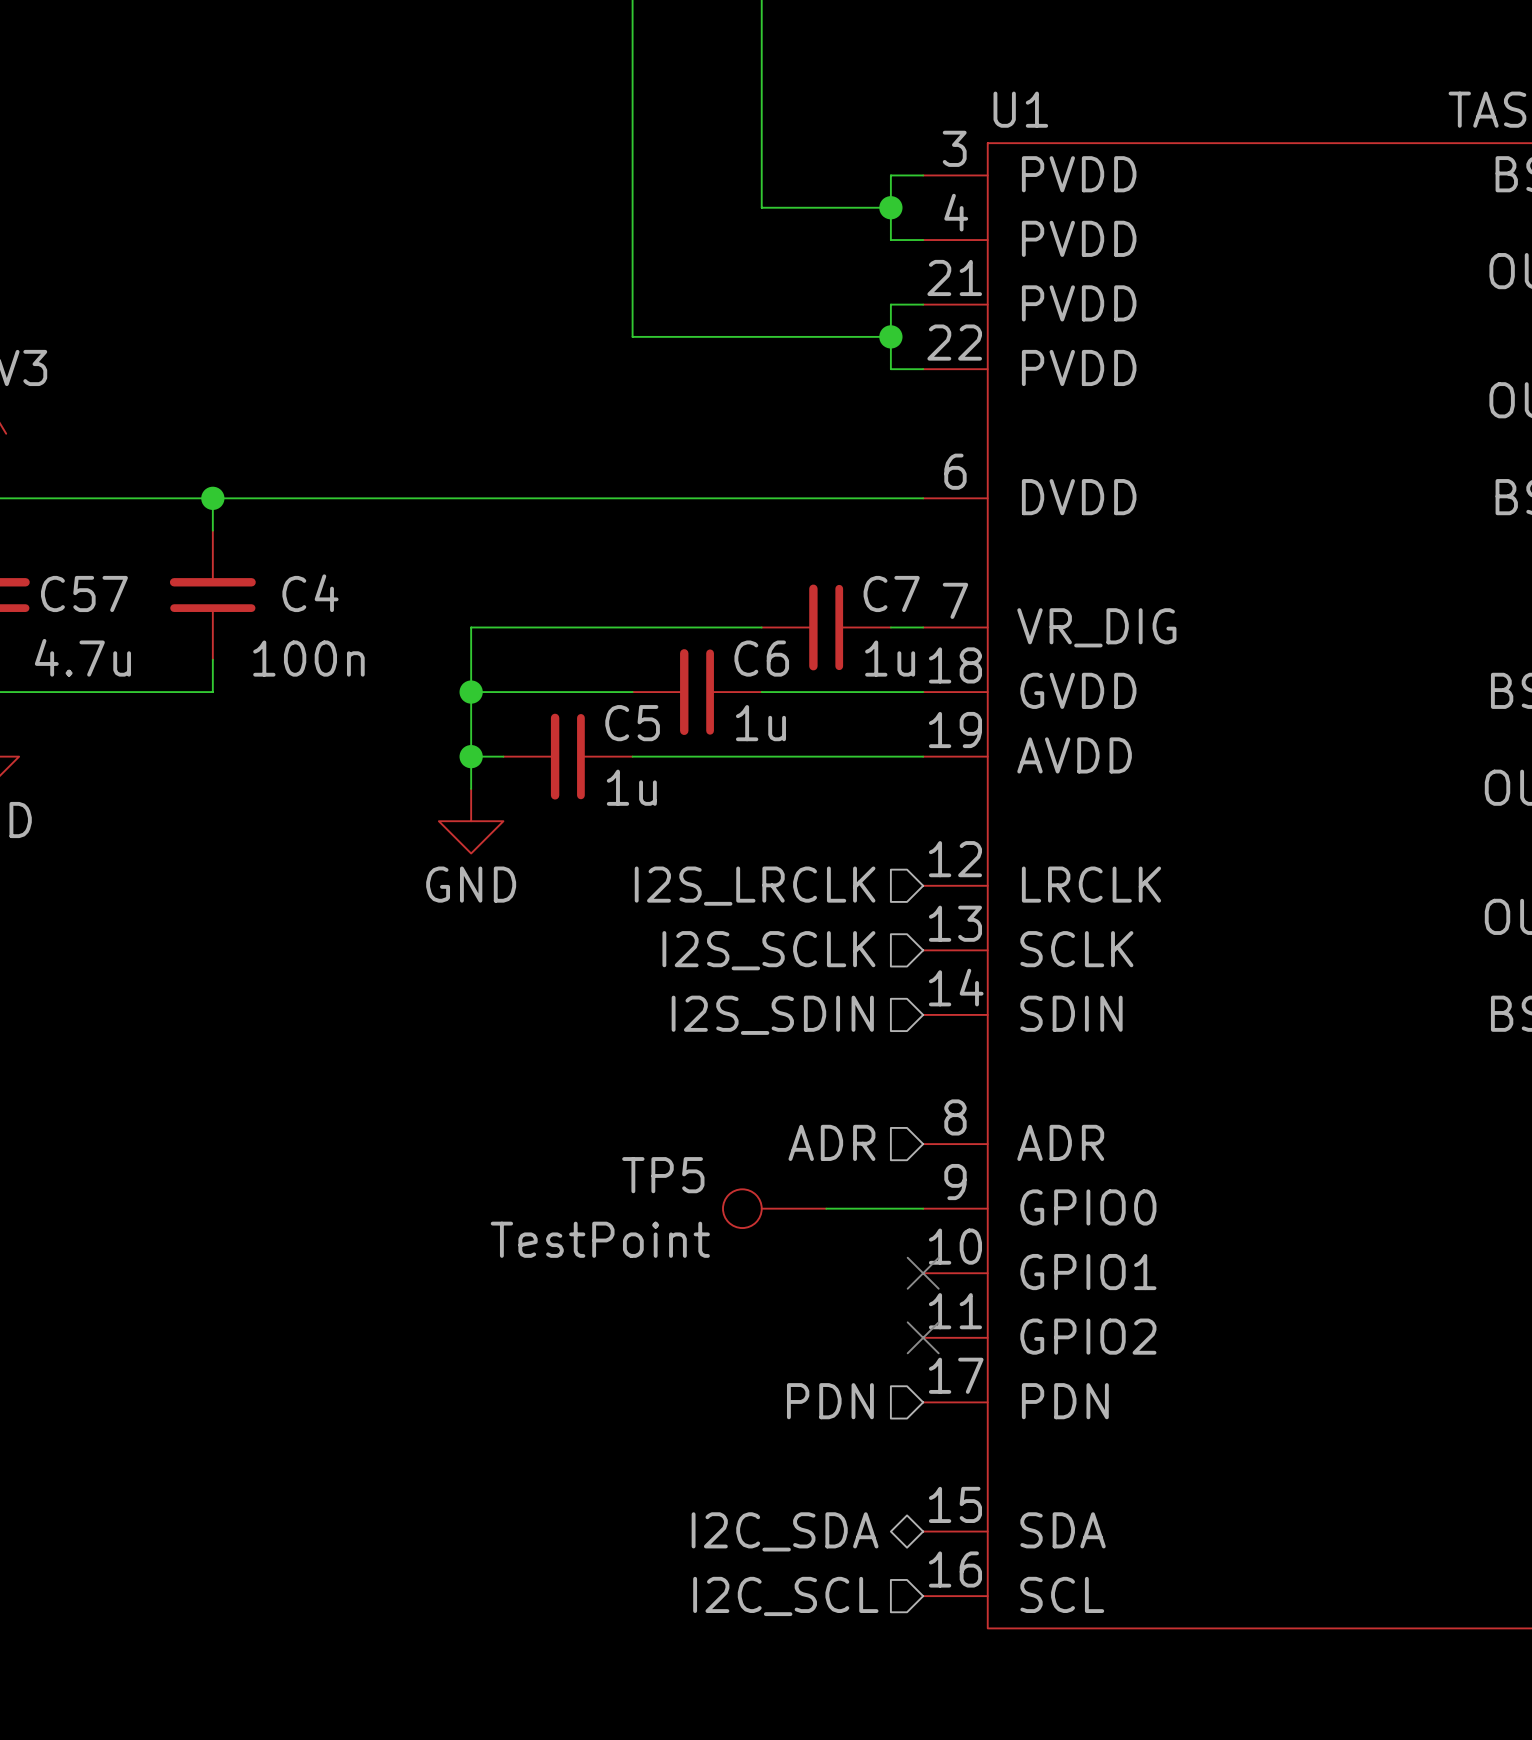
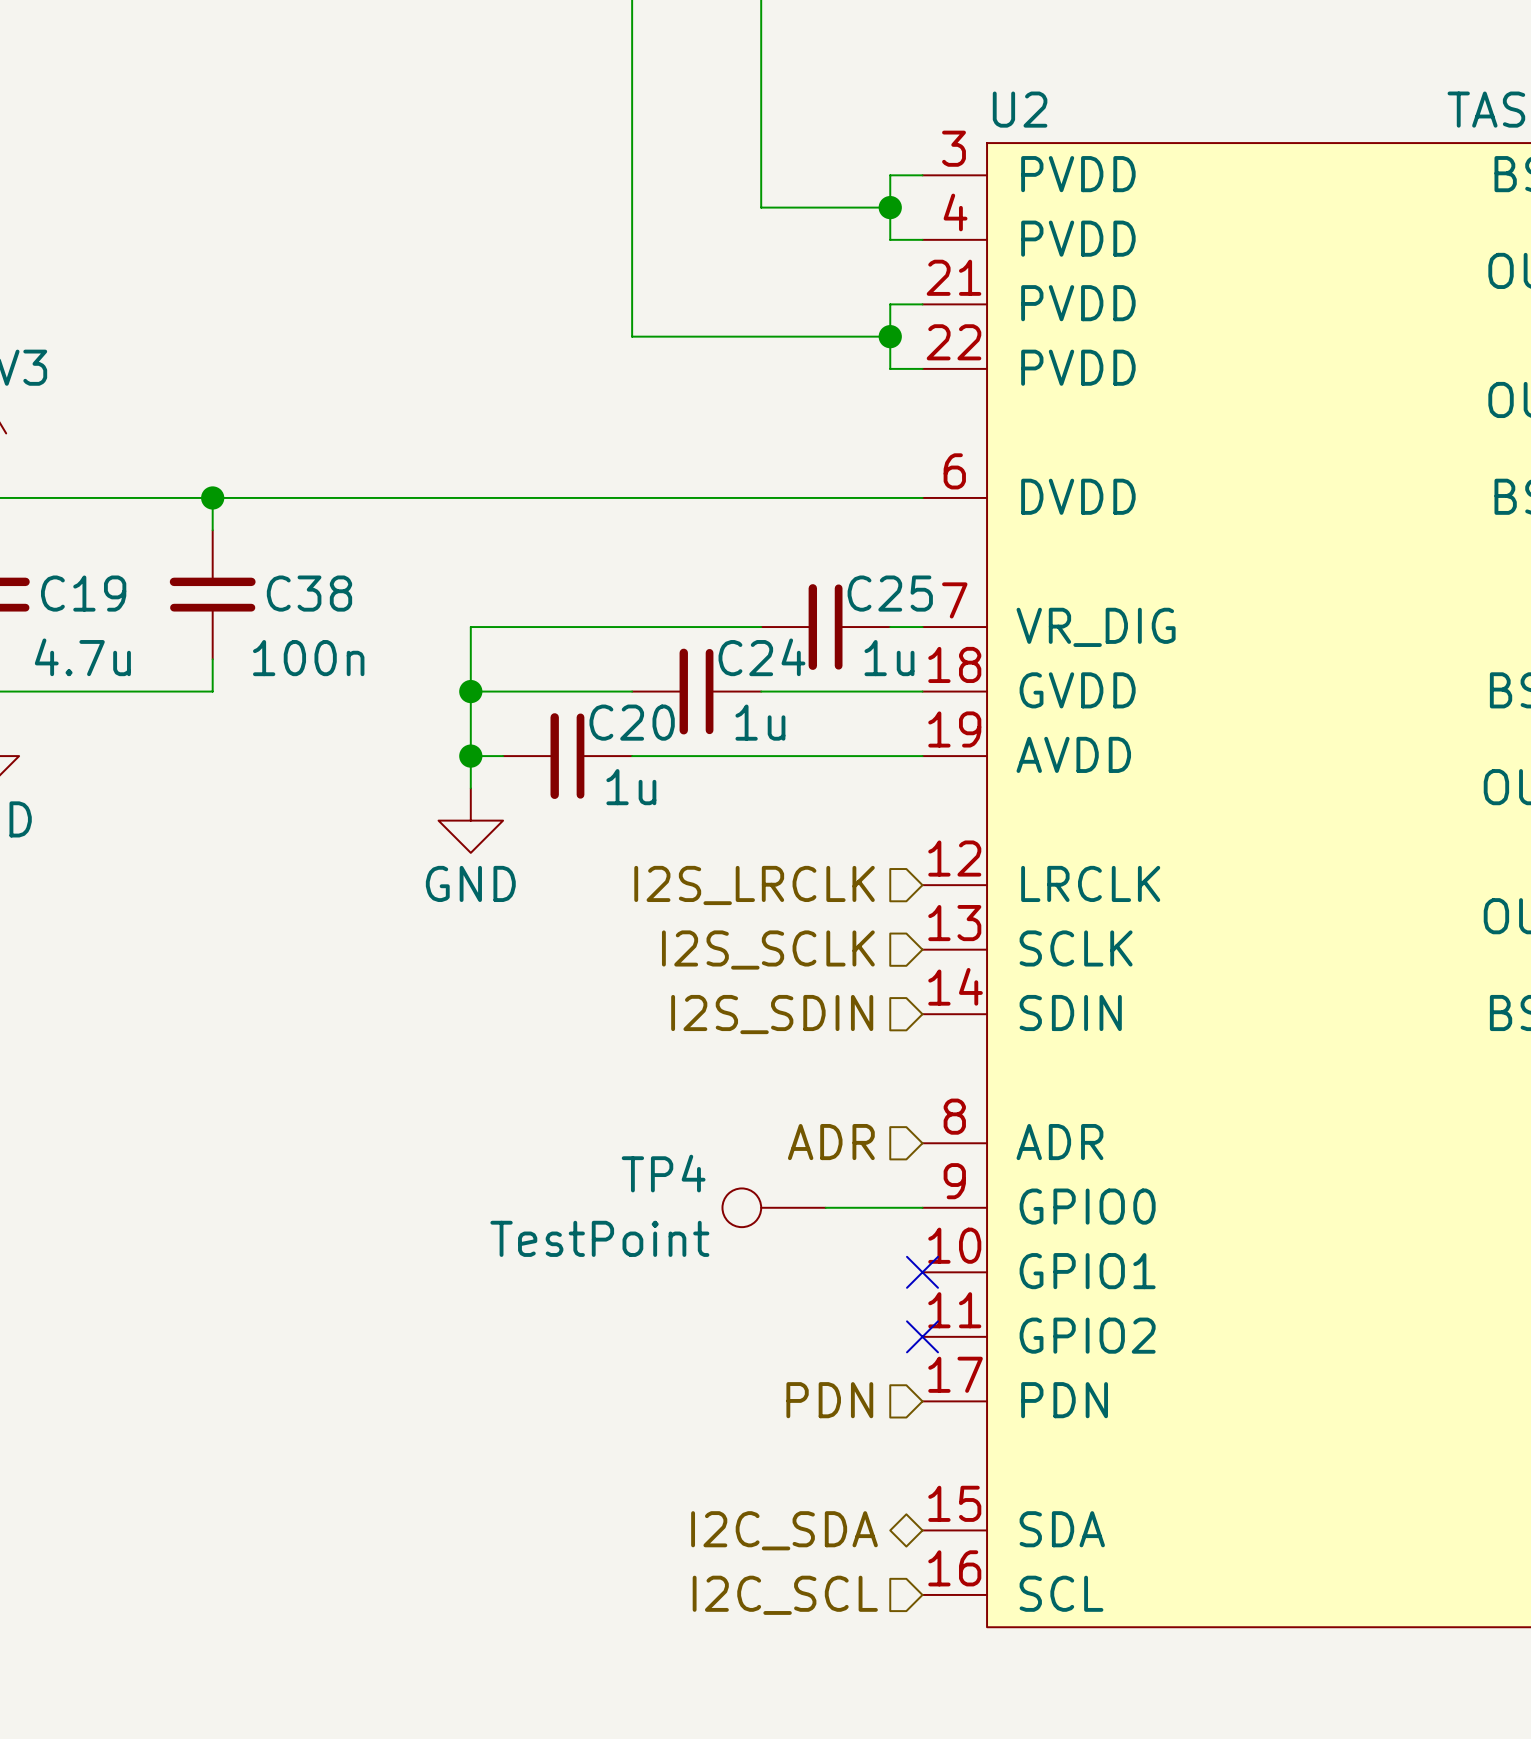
U1 name: U1 (1020, 109) -> U2 (1020, 109)
C57 name: C57 (84, 593) -> C19 (83, 593)
C4 name: C4 (310, 593) -> C38 (309, 593)
C7 name: C7 (891, 593) -> C25 (890, 593)
C6 name: C6 (761, 658) -> C24 (761, 657)
C5 name: C5 (632, 723) -> C20 (632, 722)
TP5 name: TP5 (663, 1175) -> TP4 (663, 1173)

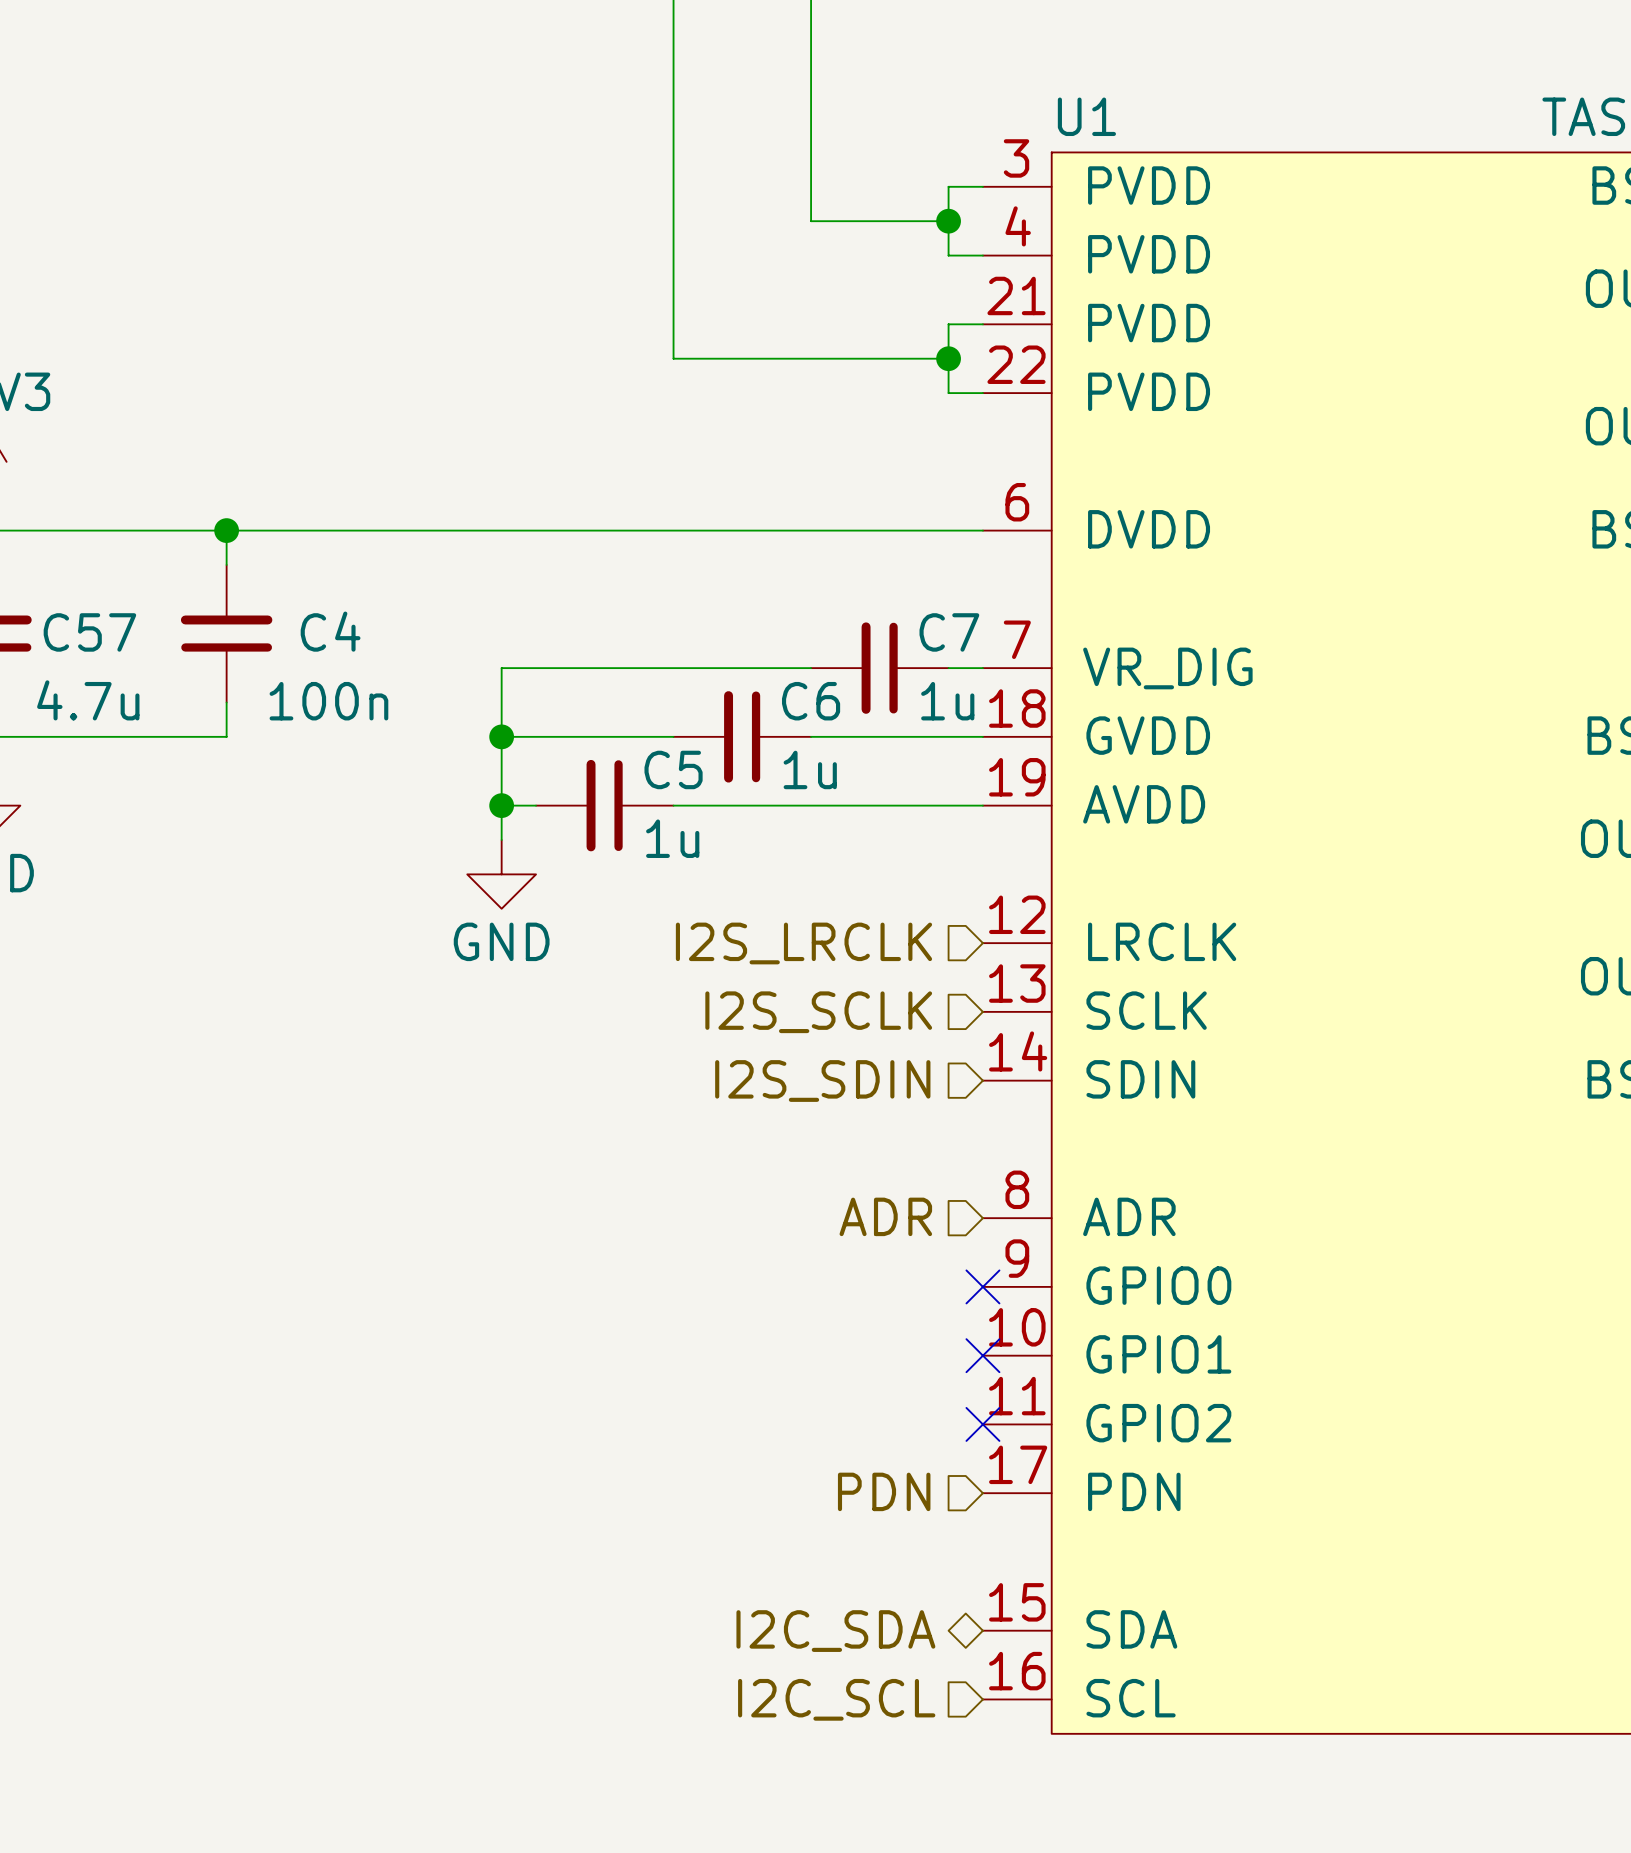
U2 name: U2 (1020, 109) -> U1 (1086, 116)
C19 name: C19 (83, 593) -> C57 (89, 632)
C38 name: C38 (309, 593) -> C4 (330, 631)
C25 name: C25 (890, 593) -> C7 (949, 632)
C24 name: C24 (761, 657) -> C6 (811, 701)
C20 name: C20 (632, 722) -> C5 (673, 769)
TP4: TestPoint (774, 1207) -> none
wire: (825, 1207) (922, 1207) -> none
no-connect mark: none -> (982, 1286)

